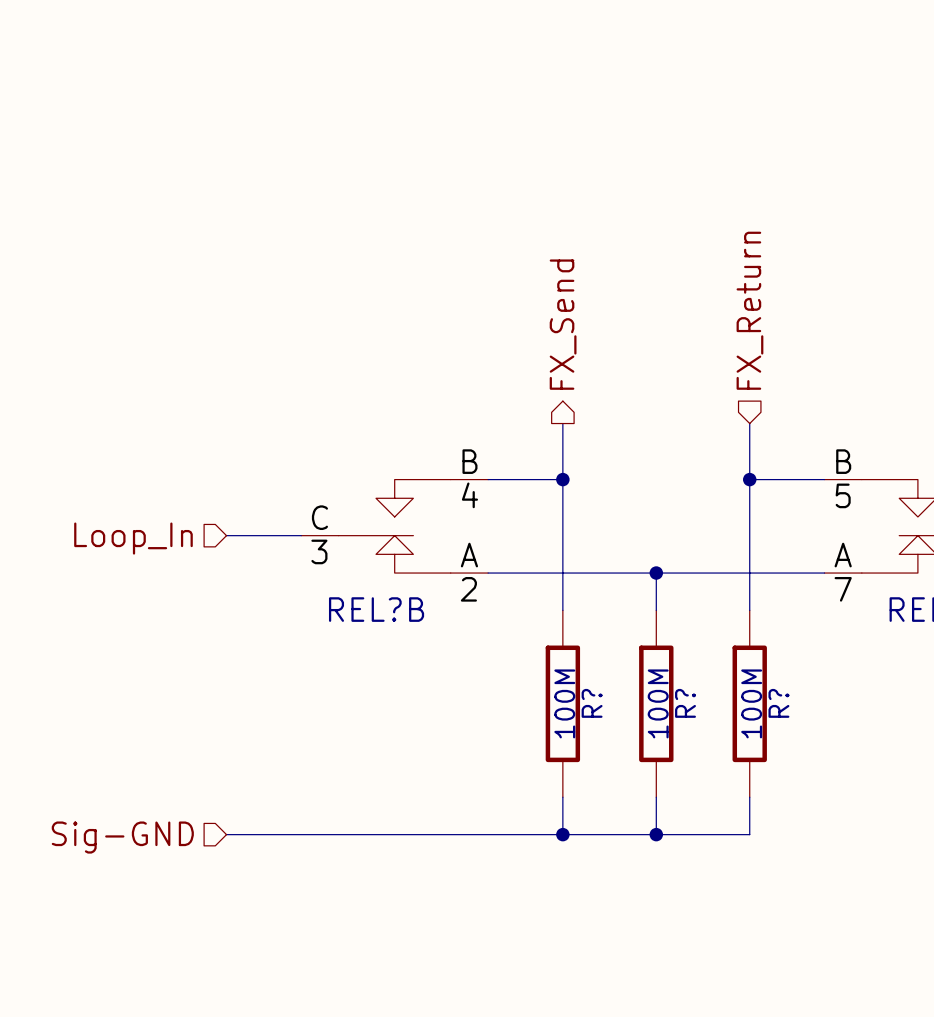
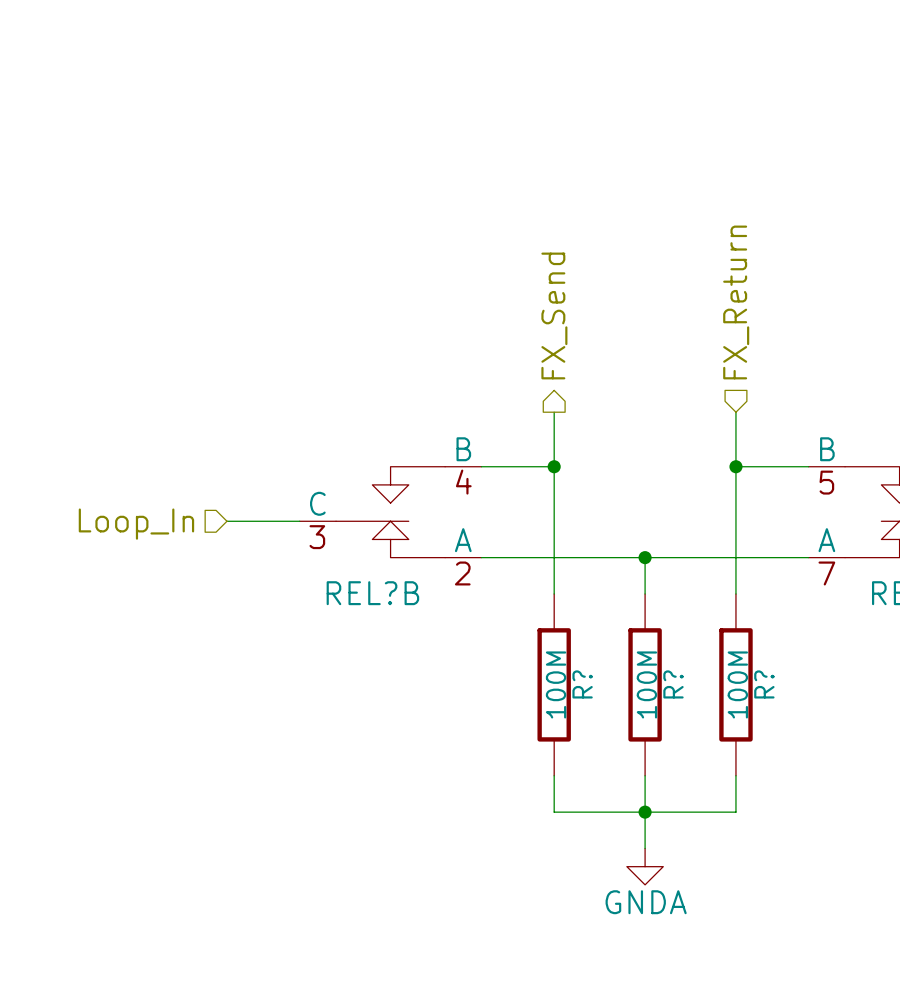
wire: (226, 834) (562, 834) -> none
junction: (562, 834) -> none
wire: none -> (645, 812) (645, 848)
hierarchical label: Sig-GND (122, 837) -> none
power symbol: none -> GNDA (645, 866)

